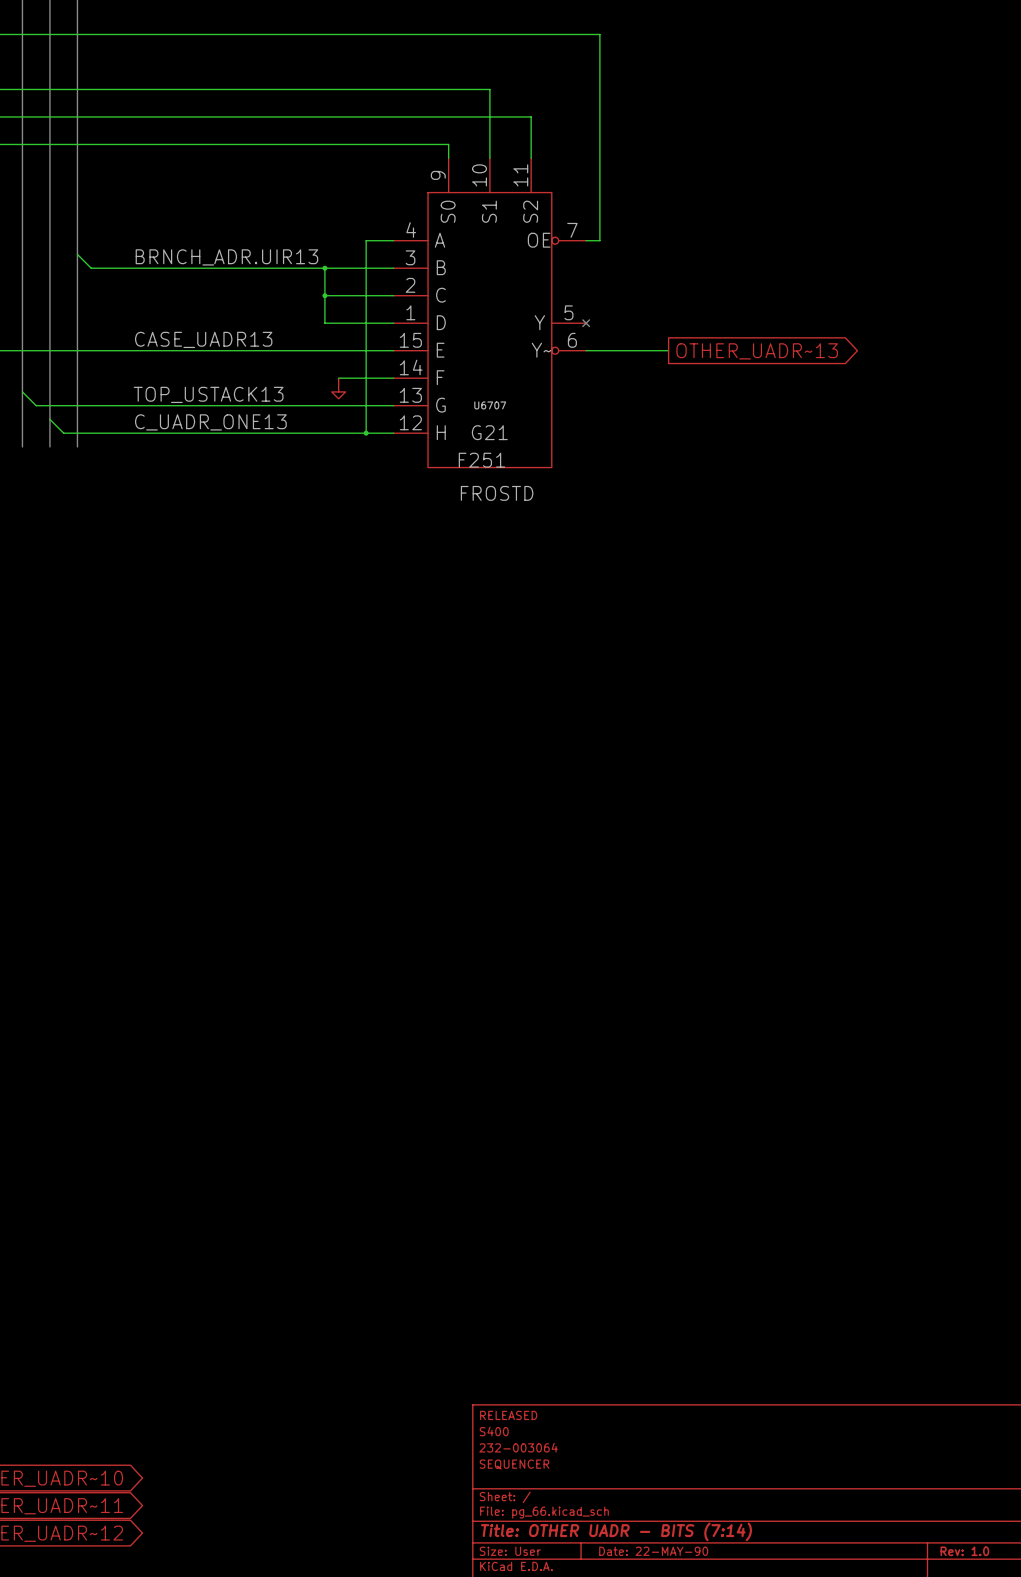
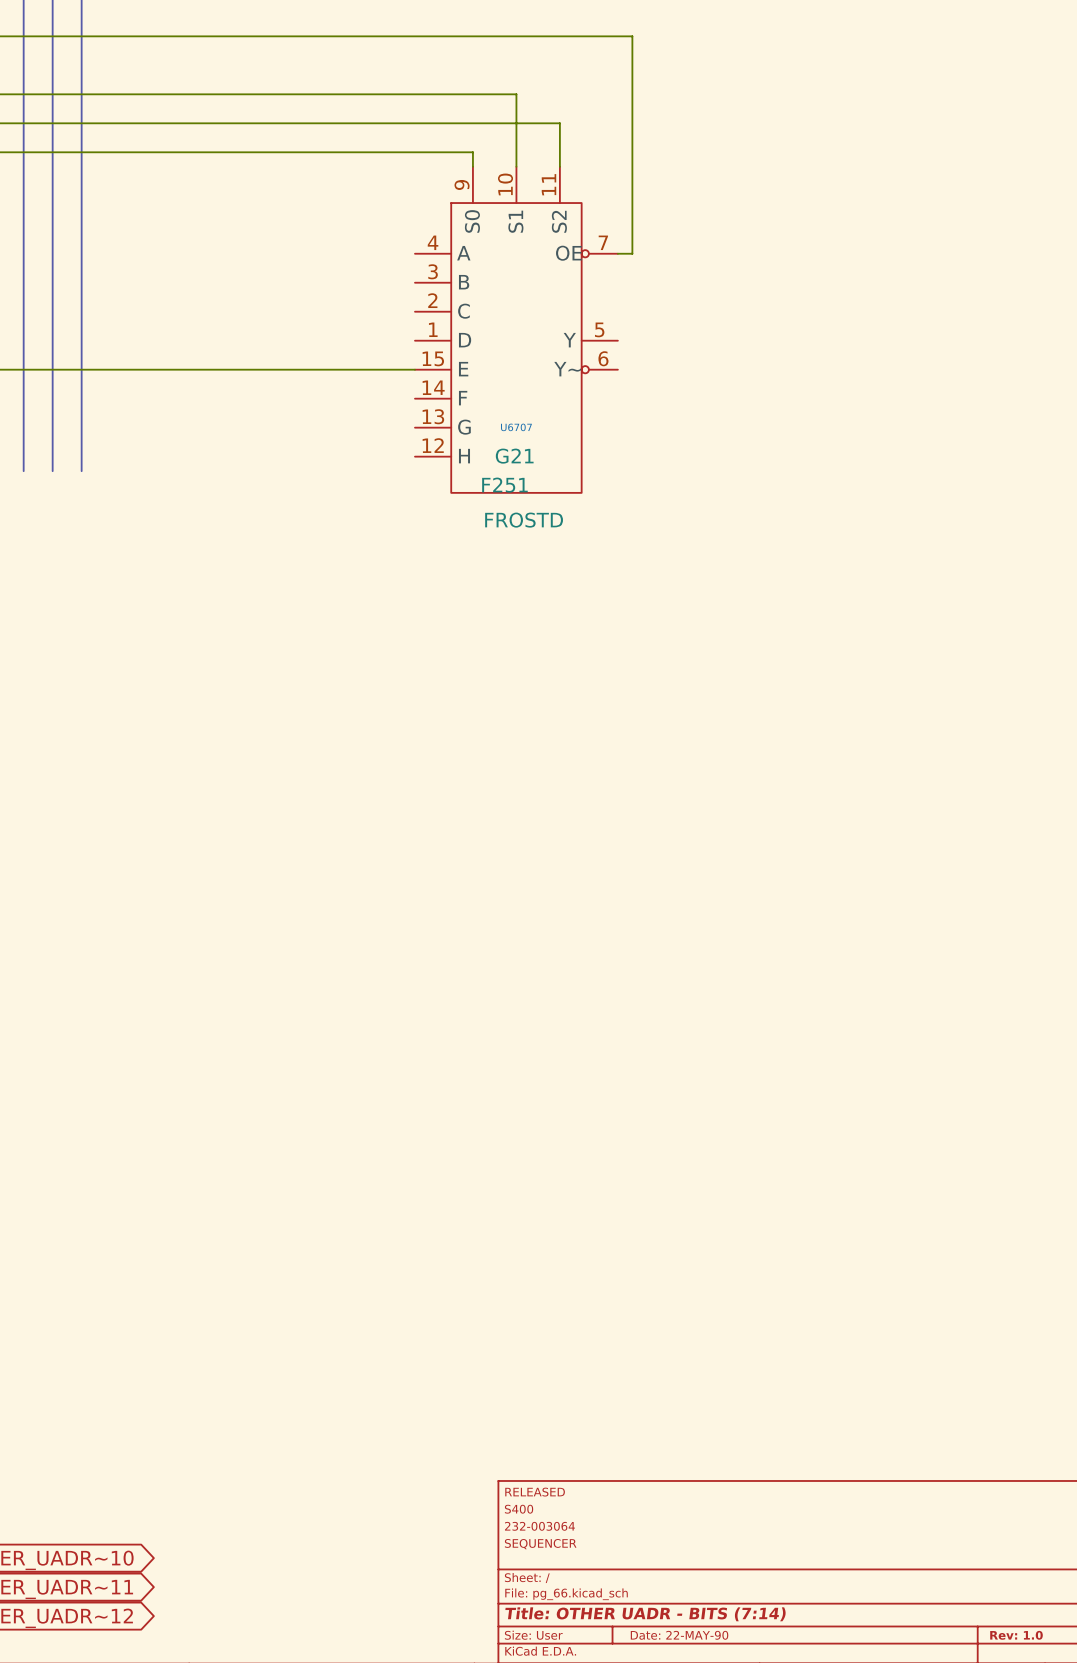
wire: (393, 240) (366, 240) (366, 433) -> none
wire: (77, 254) (91, 268) (393, 268) -> none
label: BRNCH_ADR.UIR13 (226, 257) -> none
wire: (324, 268) (324, 323) (393, 323) -> none
junction: (324, 268) -> none
wire: (324, 295) (393, 295) -> none
junction: (324, 295) -> none
no-connect mark: (586, 323) -> none
label: CASE_UADR13 (203, 339) -> none
wire: (586, 350) (668, 350) -> none
global label: OTHER_UADR~13 (757, 351) -> none
wire: (338, 378) (393, 378) -> none
power symbol: (338, 388) -> none
wire: (22, 391) (36, 405) (393, 405) -> none
label: TOP_USTACK13 (208, 394) -> none
wire: (49, 419) (63, 433) (393, 433) -> none
label: C_UADR_ONE13 (210, 422) -> none
junction: (366, 433) -> none

